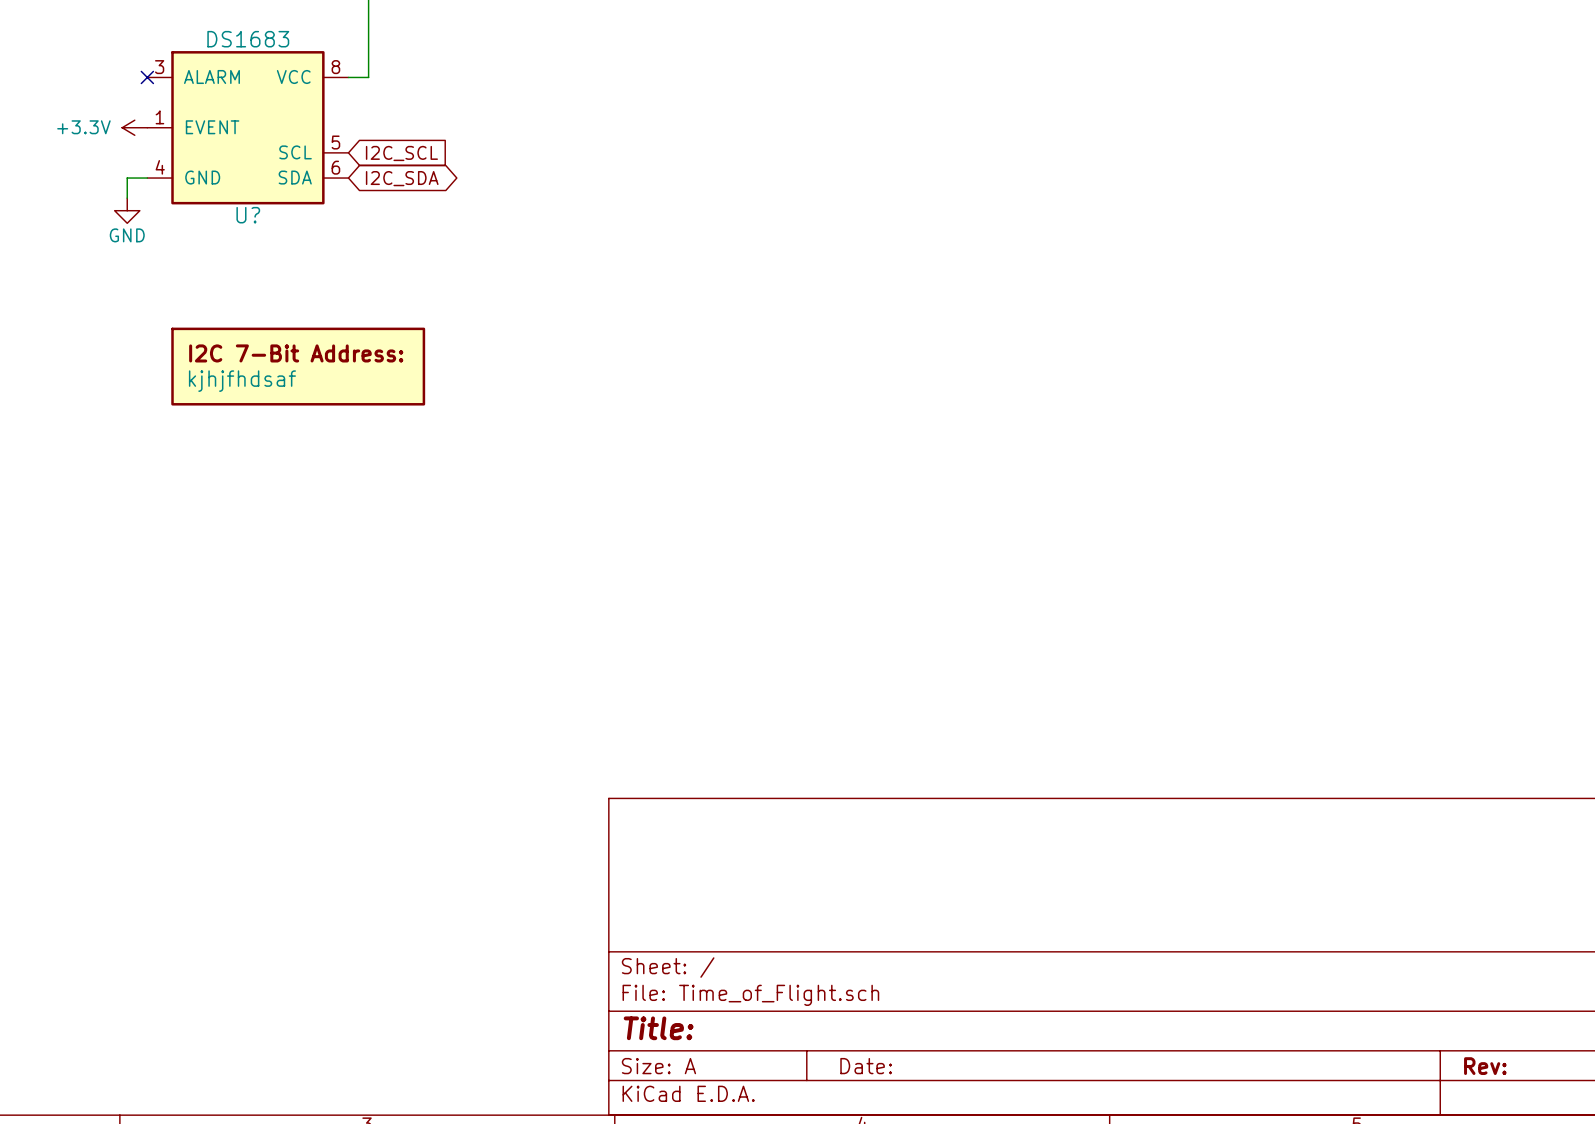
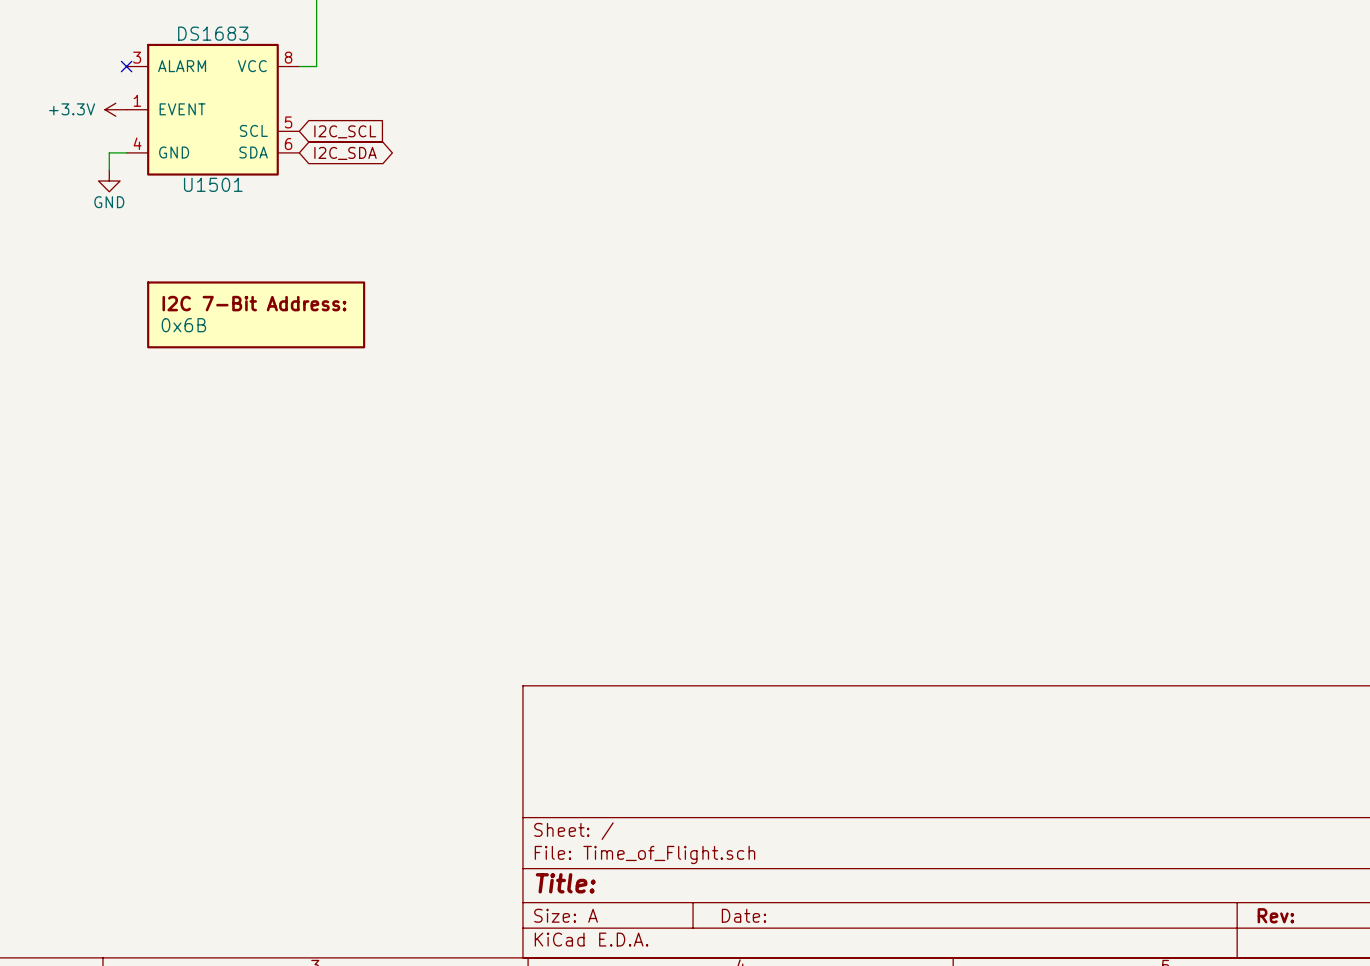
U? name: U? (248, 215) -> U1501 (213, 184)
part value: kjhjfhdsaf (242, 381) -> 0x6B (183, 325)

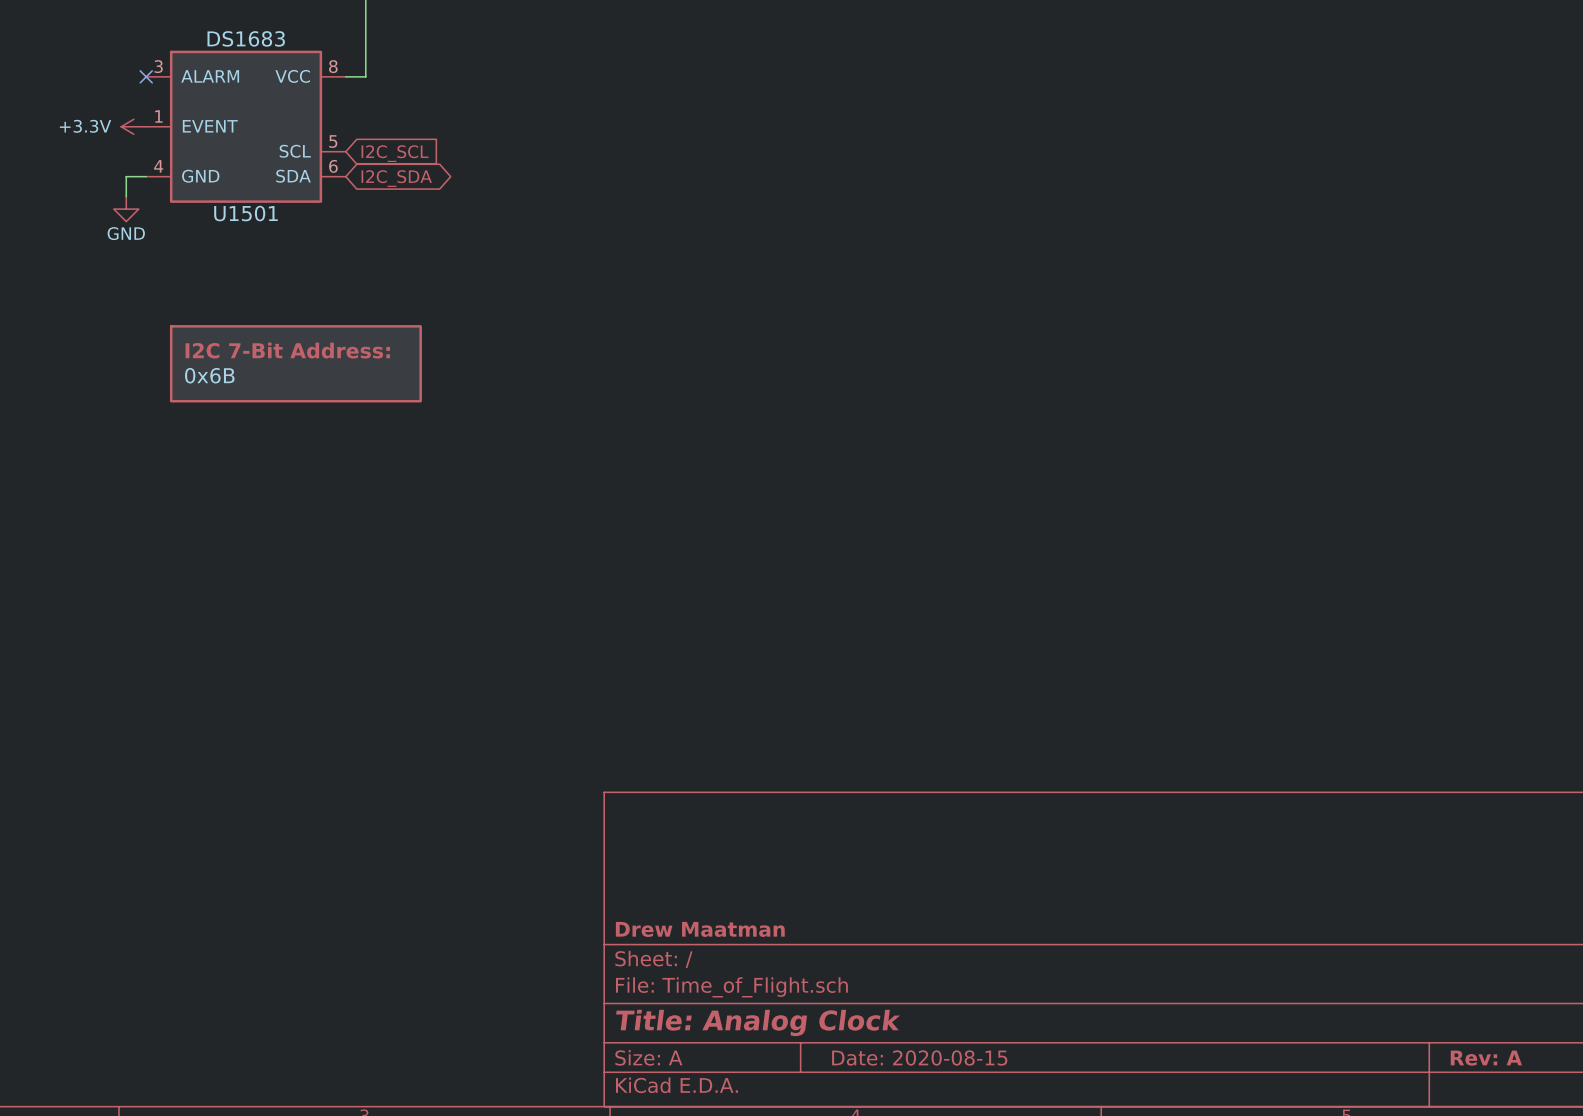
title block: none -> Drew Maatman (700, 929)
title block: Title: (565, 883) -> Title: Analog Clock (758, 1022)
title block: Date: (743, 915) -> Date: 2020-08-15 (919, 1057)
title block: Rev: (1275, 915) -> Rev: A (1486, 1058)

